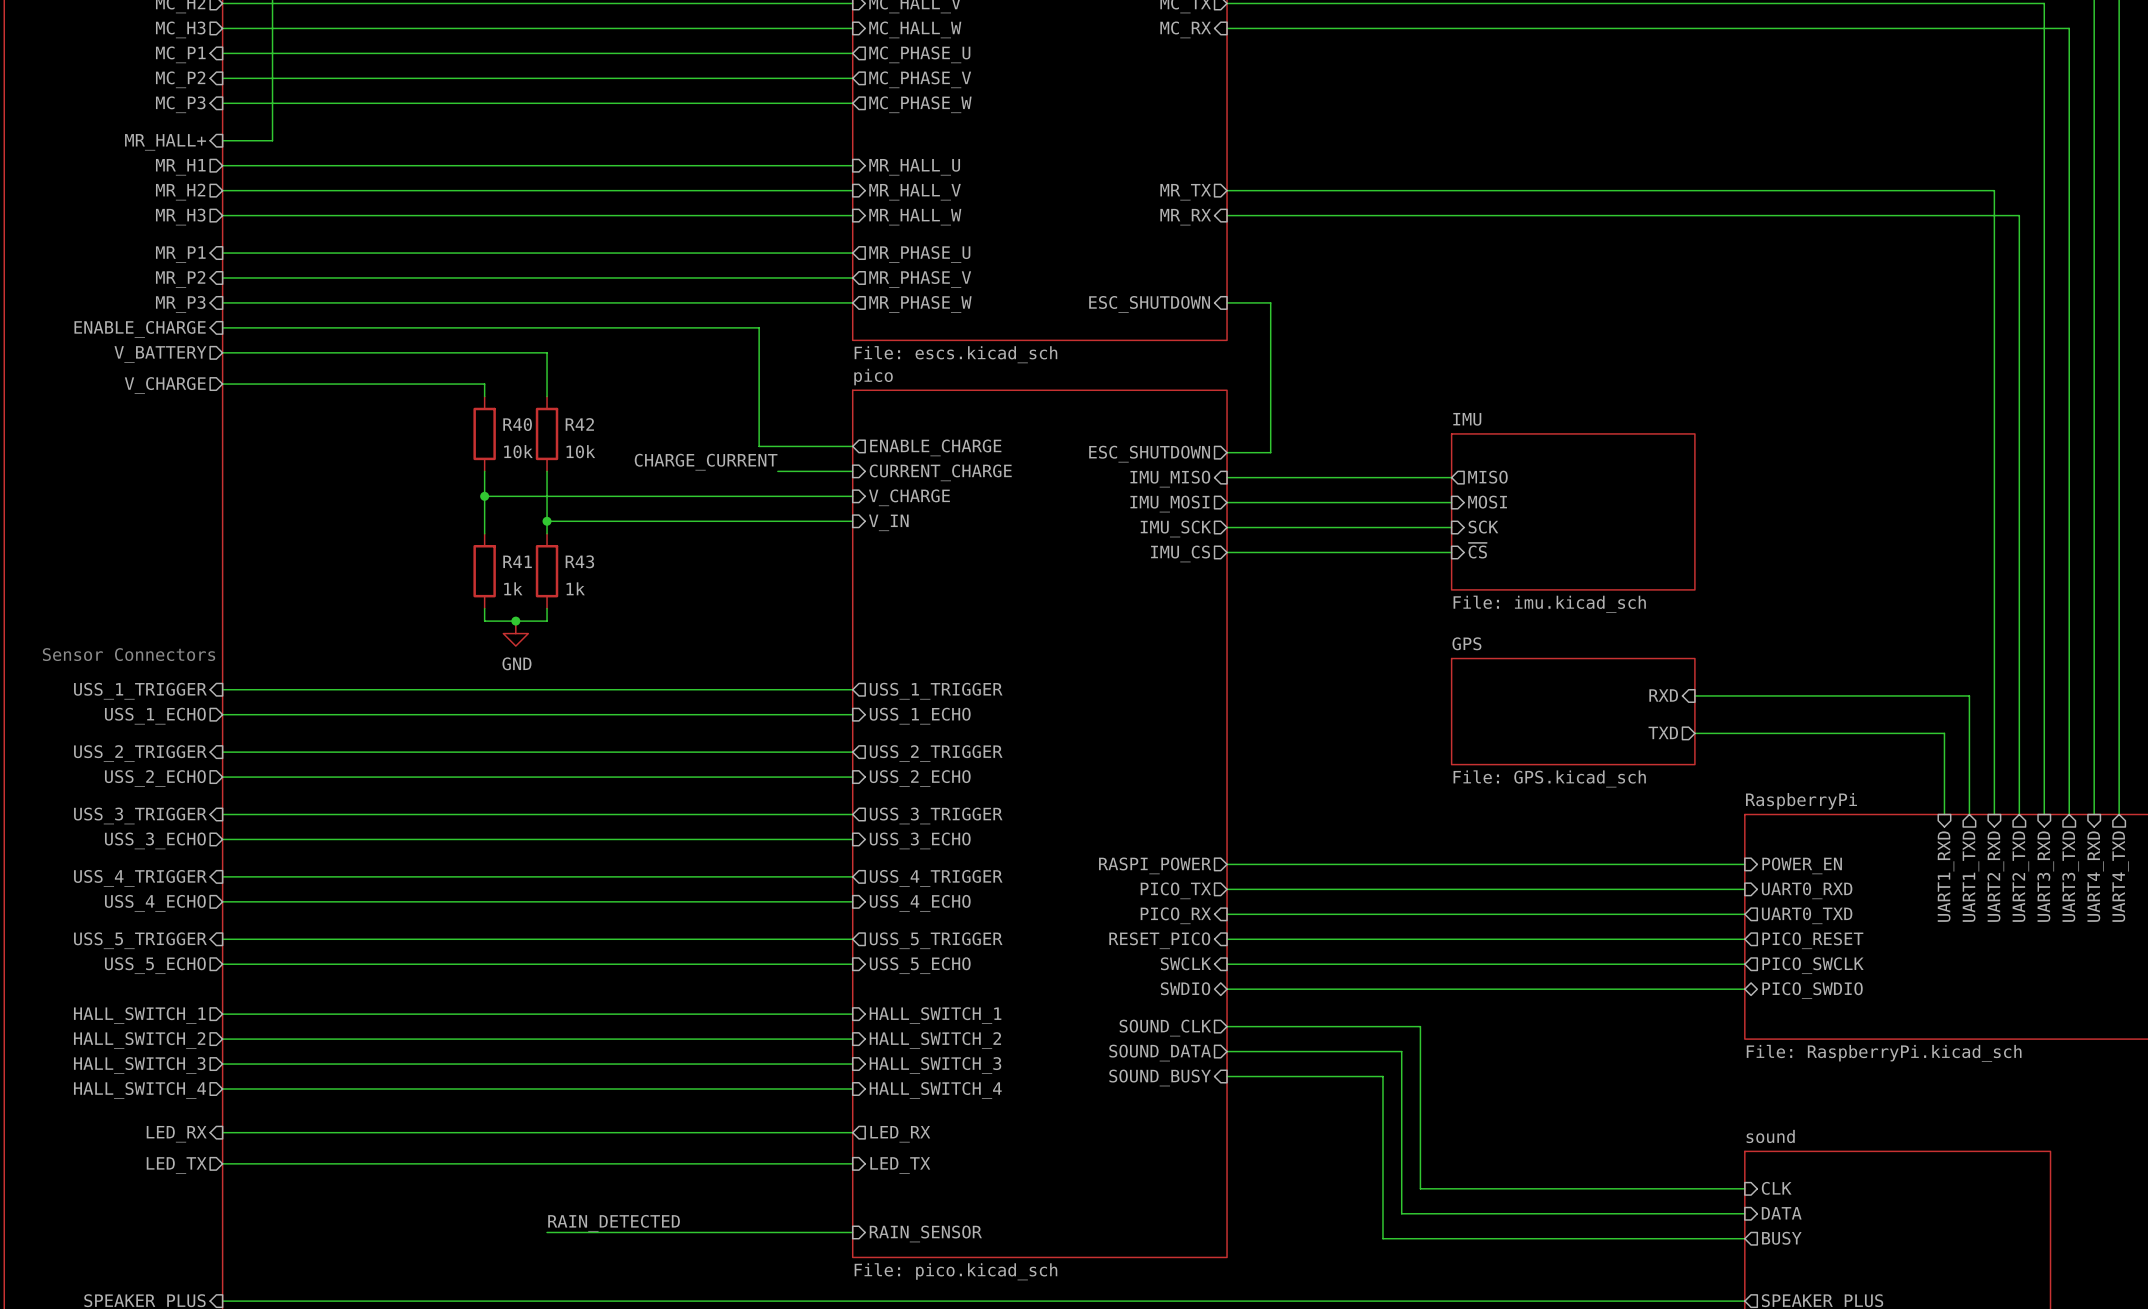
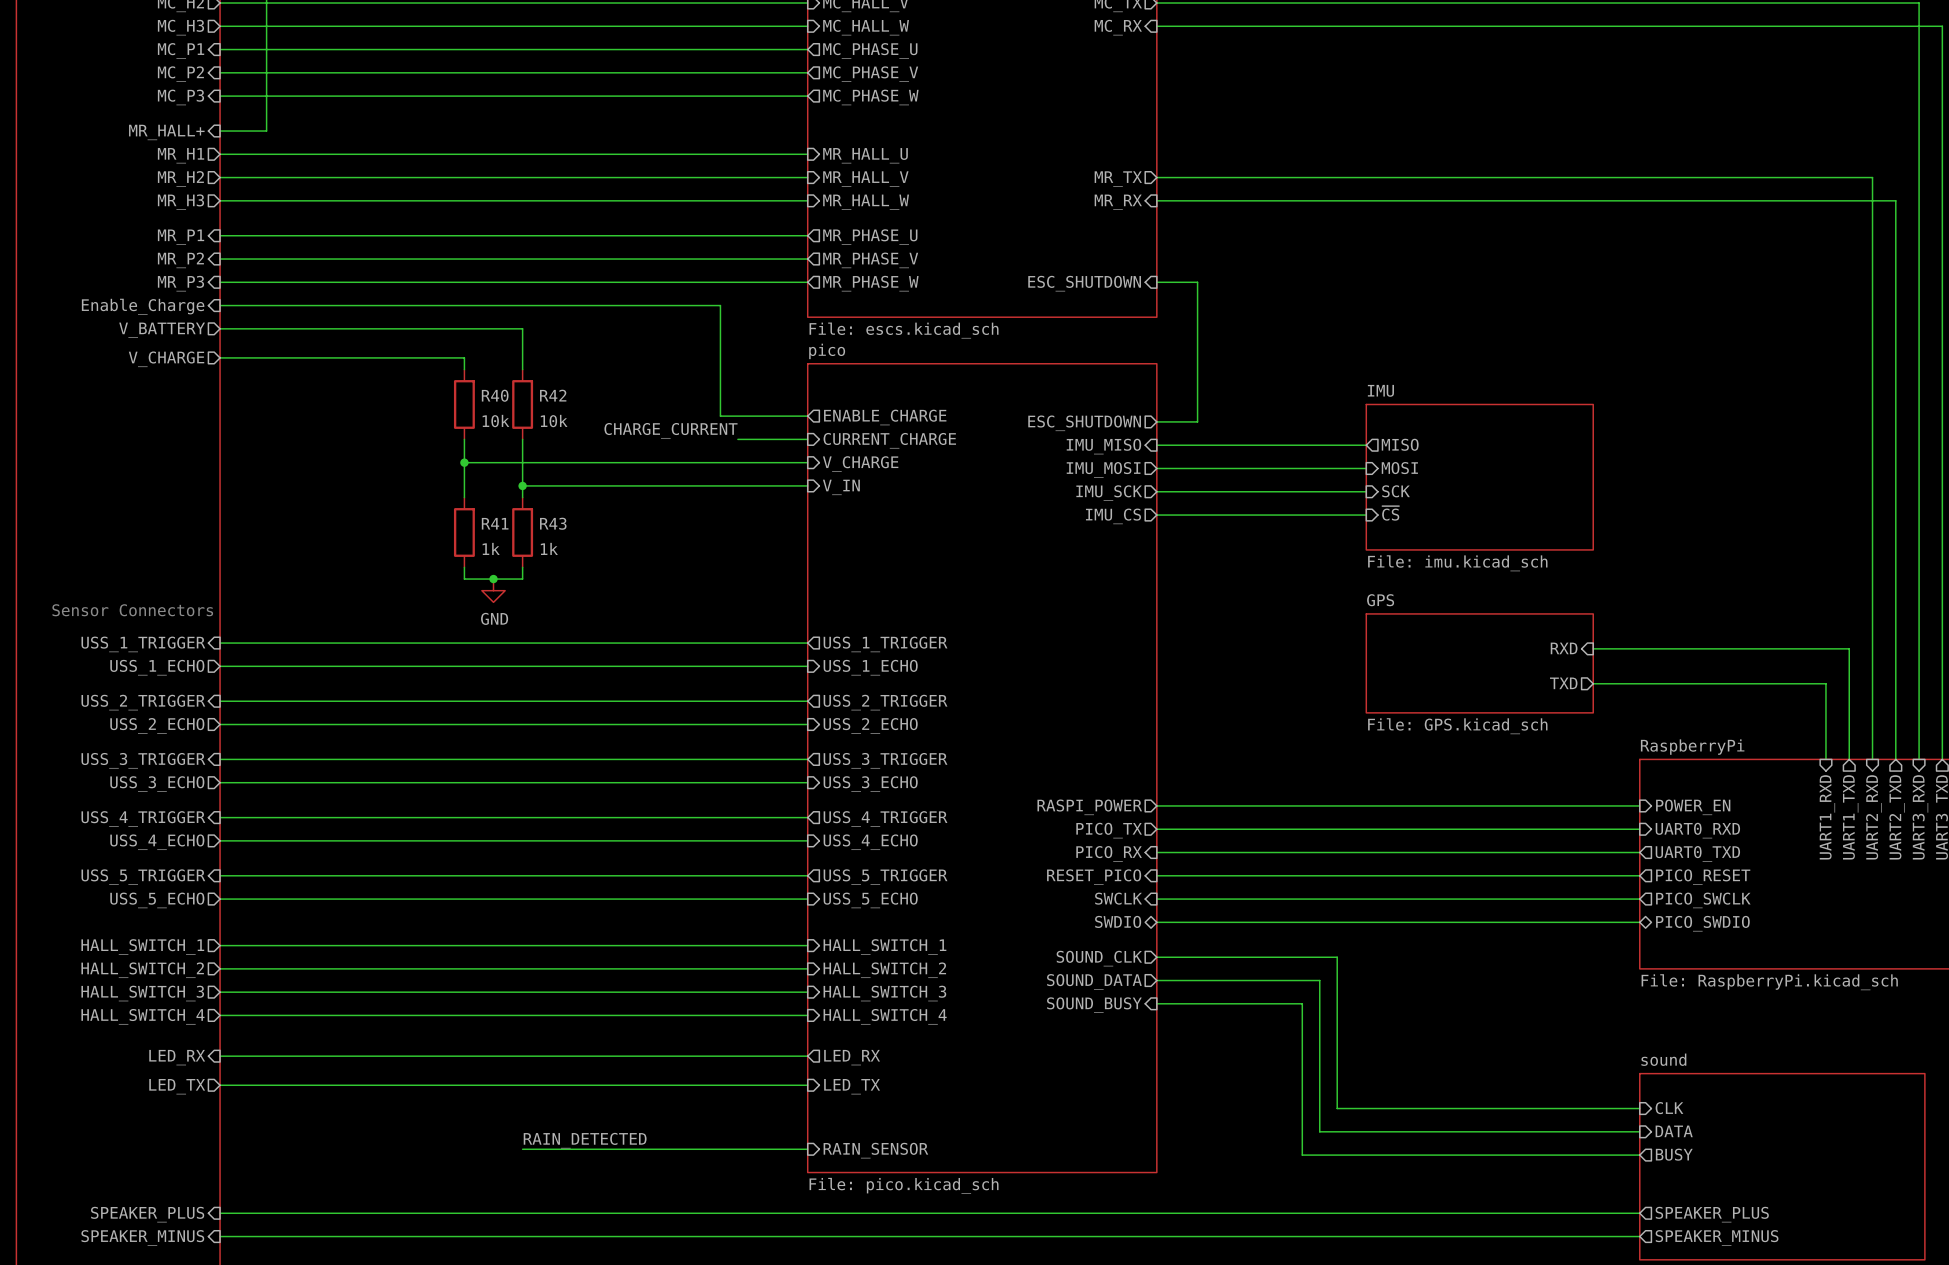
sheet pin: ENABLE_CHARGE (140, 329) -> Enable_Charge (143, 306)

